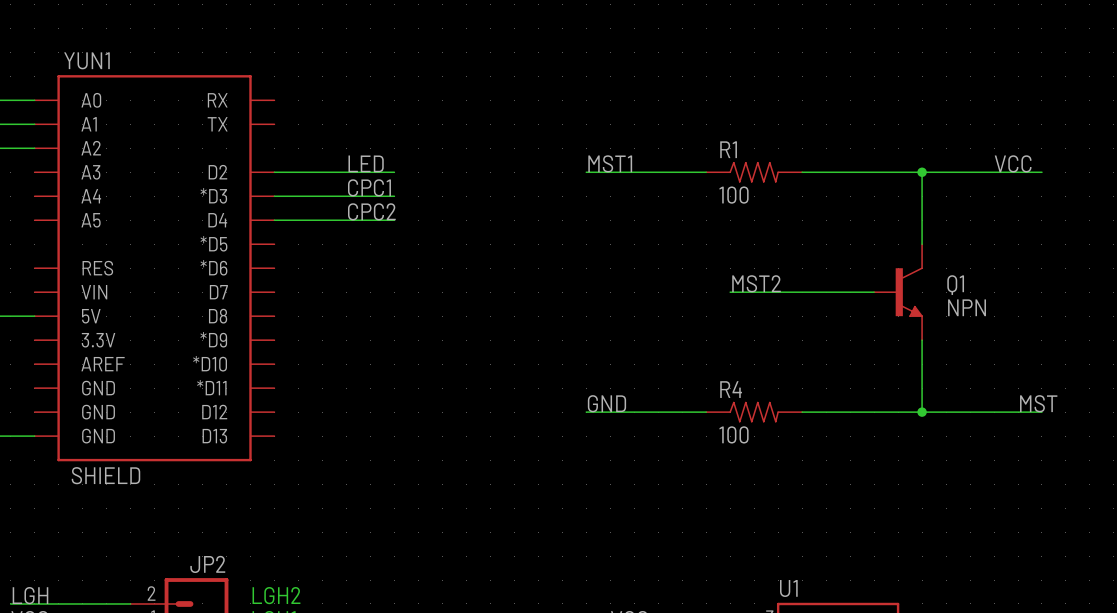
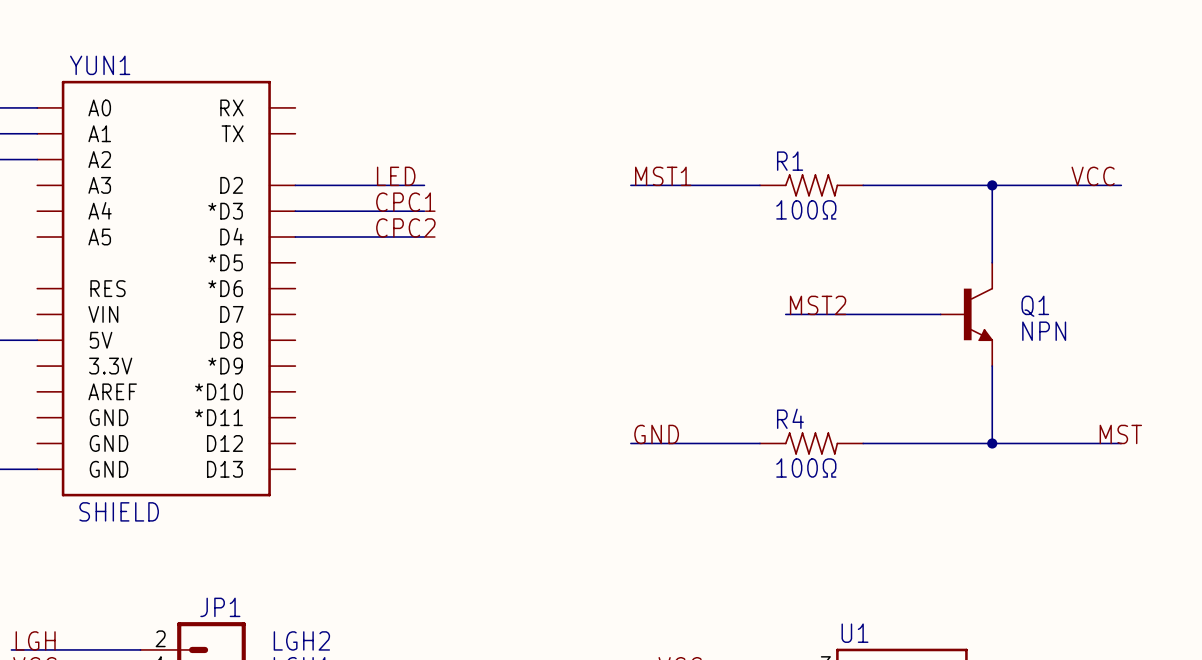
R1 value: 100 (734, 195) -> 100Ω (806, 209)
R4 value: 100 (734, 434) -> 100Ω (806, 468)
JP2 name: JP2 (207, 564) -> JP1 (220, 607)

